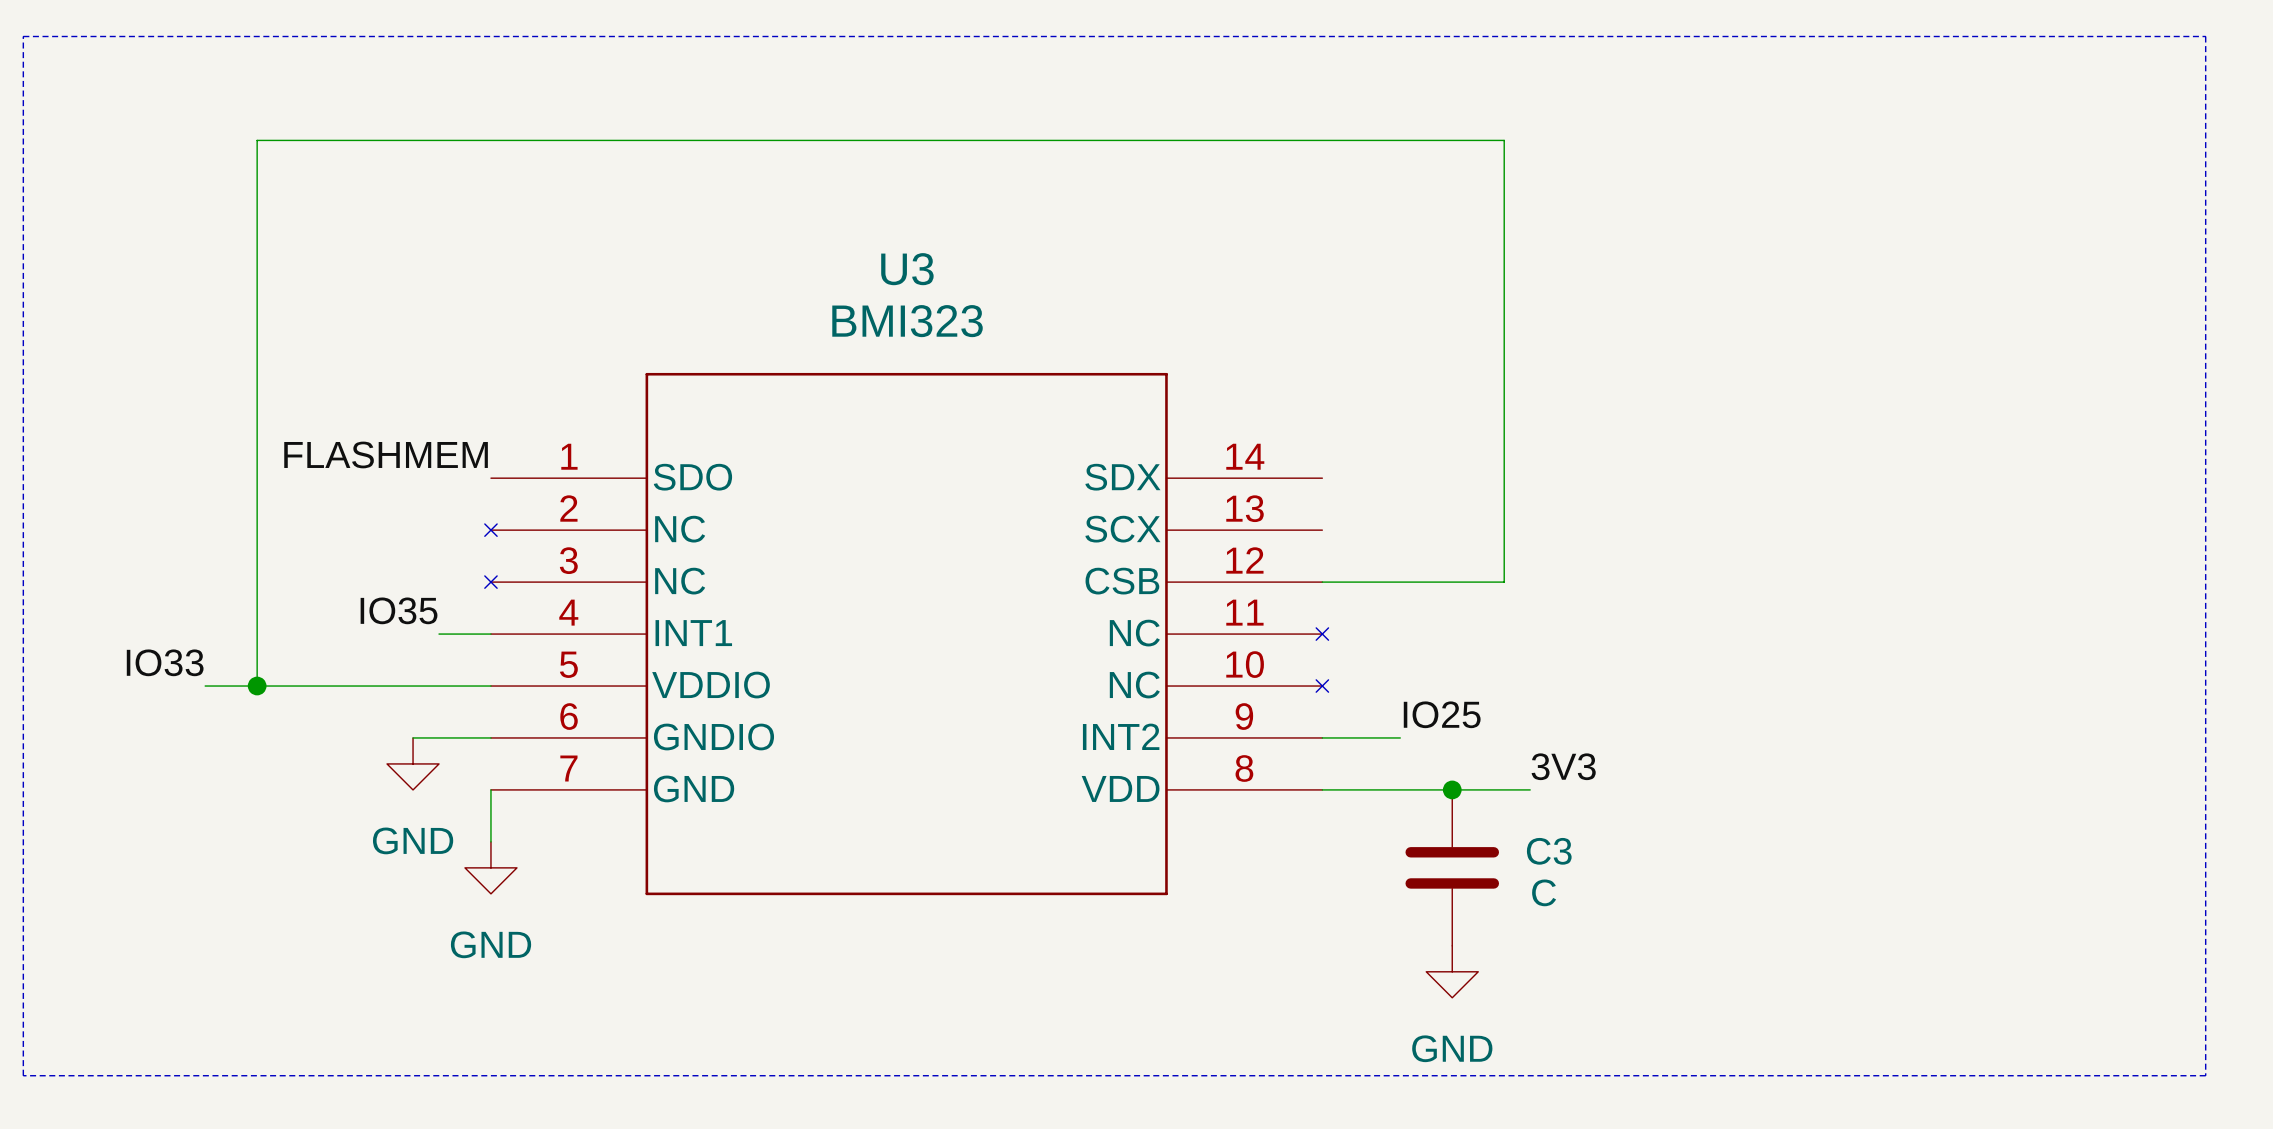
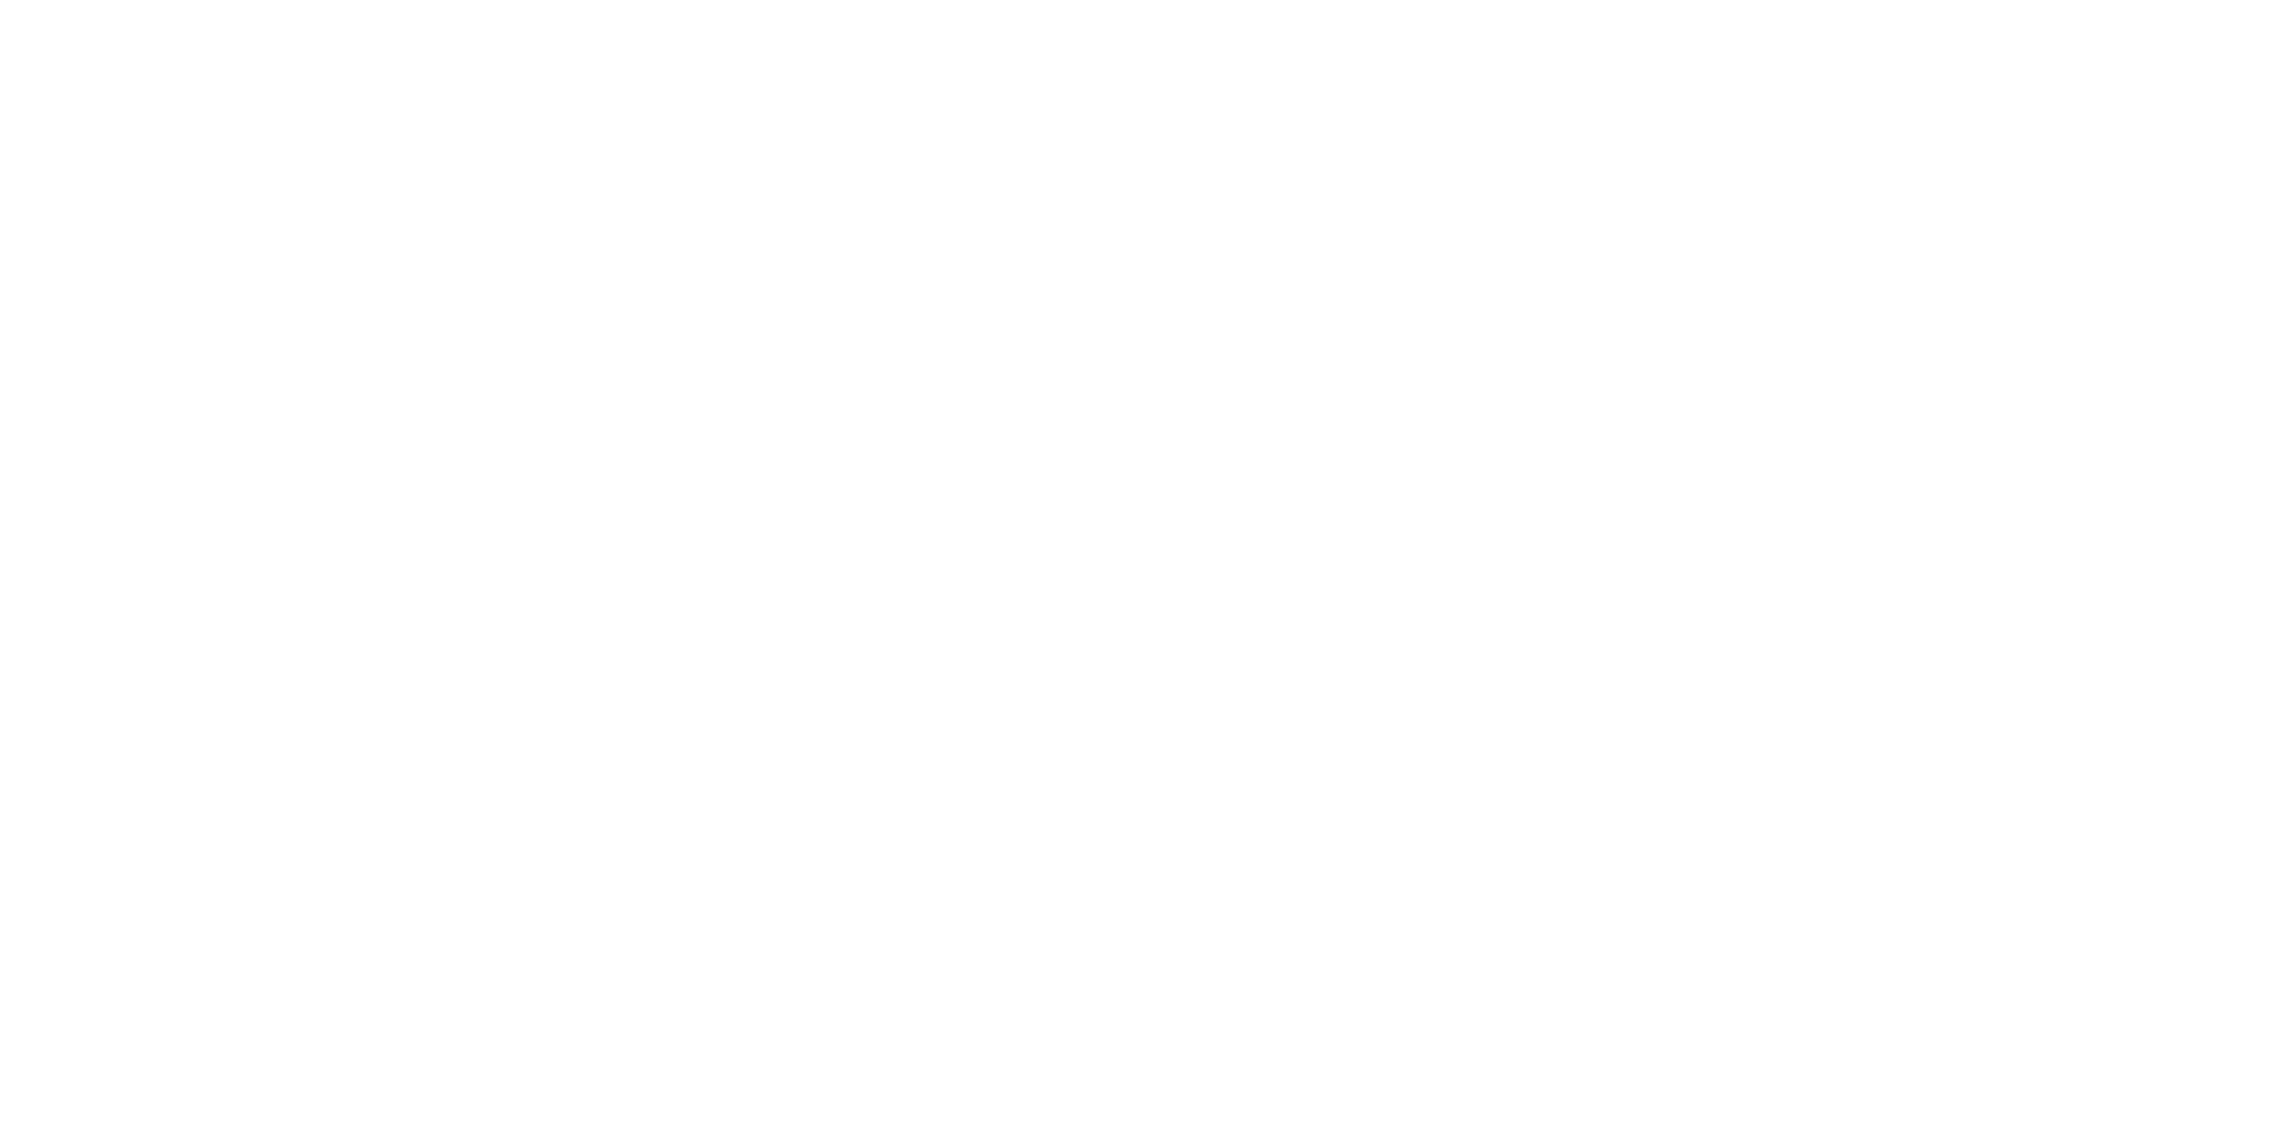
line: (23, 36) (2205, 36) (2205, 1075) (23, 1075) (23, 36) -> none
label: FLASHMEM (386, 454) -> none
wire: (1322, 582) (1504, 582) (1504, 140) (257, 140) (257, 686) -> none
label: IO35 (399, 610) -> none
wire: (439, 634) (490, 634) -> none
U3: BMI323 (906, 634) -> none
label: IO33 (165, 662) -> none
wire: (205, 686) (490, 686) -> none
junction: (257, 686) -> none
label: IO25 (1442, 714) -> none
wire: (413, 737) (490, 737) -> none
wire: (1322, 737) (1400, 737) -> none
power symbol: GND (413, 763) -> none
label: 3V3 (1563, 766) -> none
wire: (490, 789) (490, 841) -> none
wire: (1322, 789) (1530, 789) -> none
junction: (1452, 789) -> none
power symbol: GND (490, 867) -> none
C3: C (1452, 867) -> none
power symbol: GND (1452, 971) -> none

